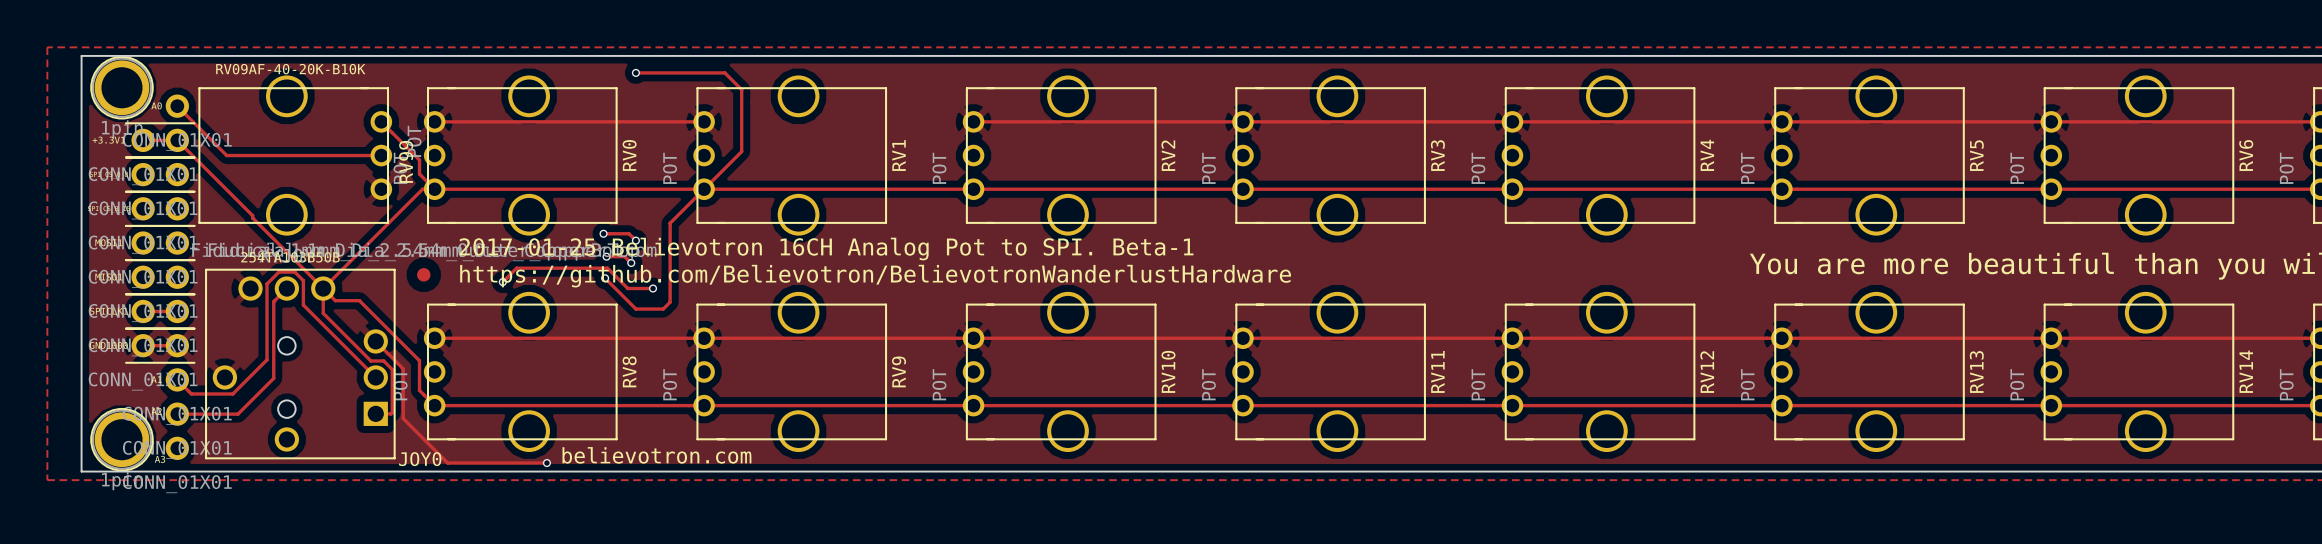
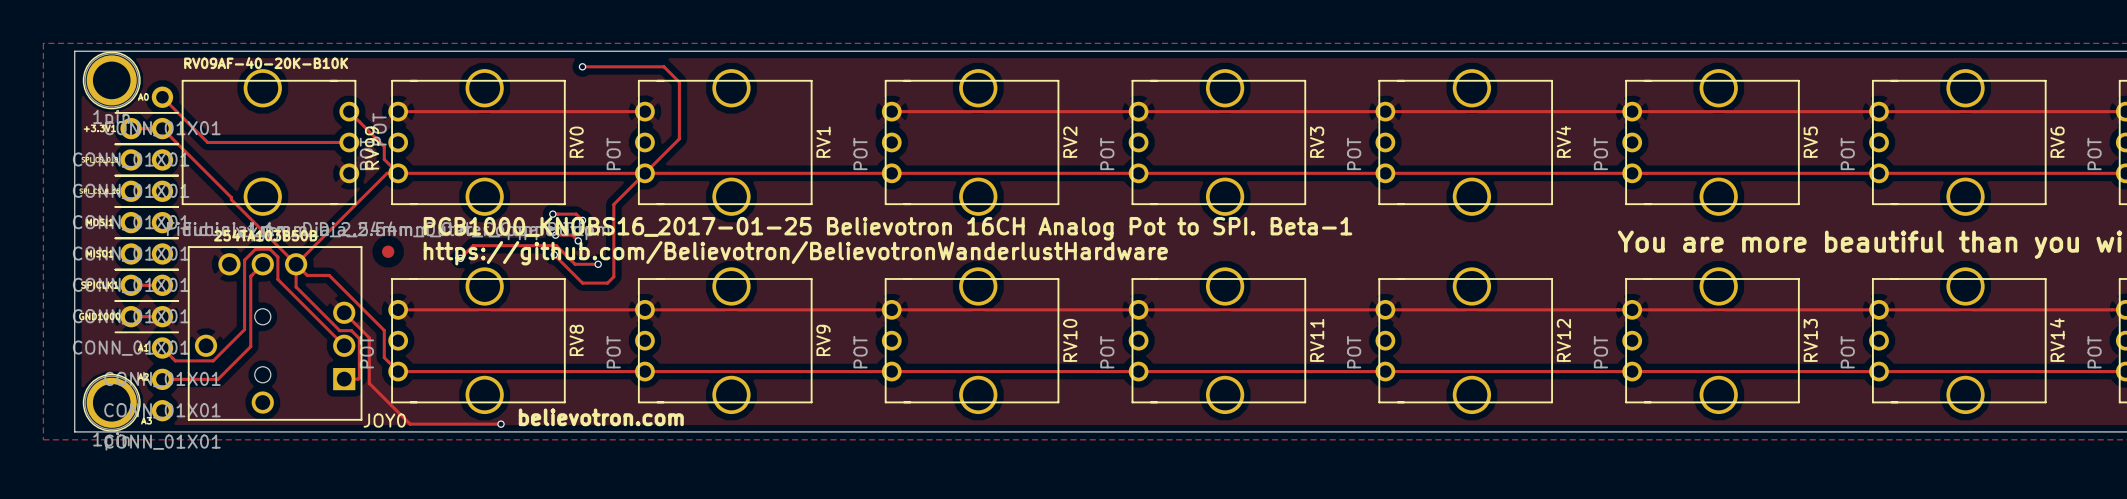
text: 2017-01-25 Believotron 16CH Analog Pot to SPI. Beta-1 (826, 249) -> PCB1000_KNOBS16_2017-01-25 Believotron 16CH Analog Pot to SPI. Beta-1 (887, 228)

